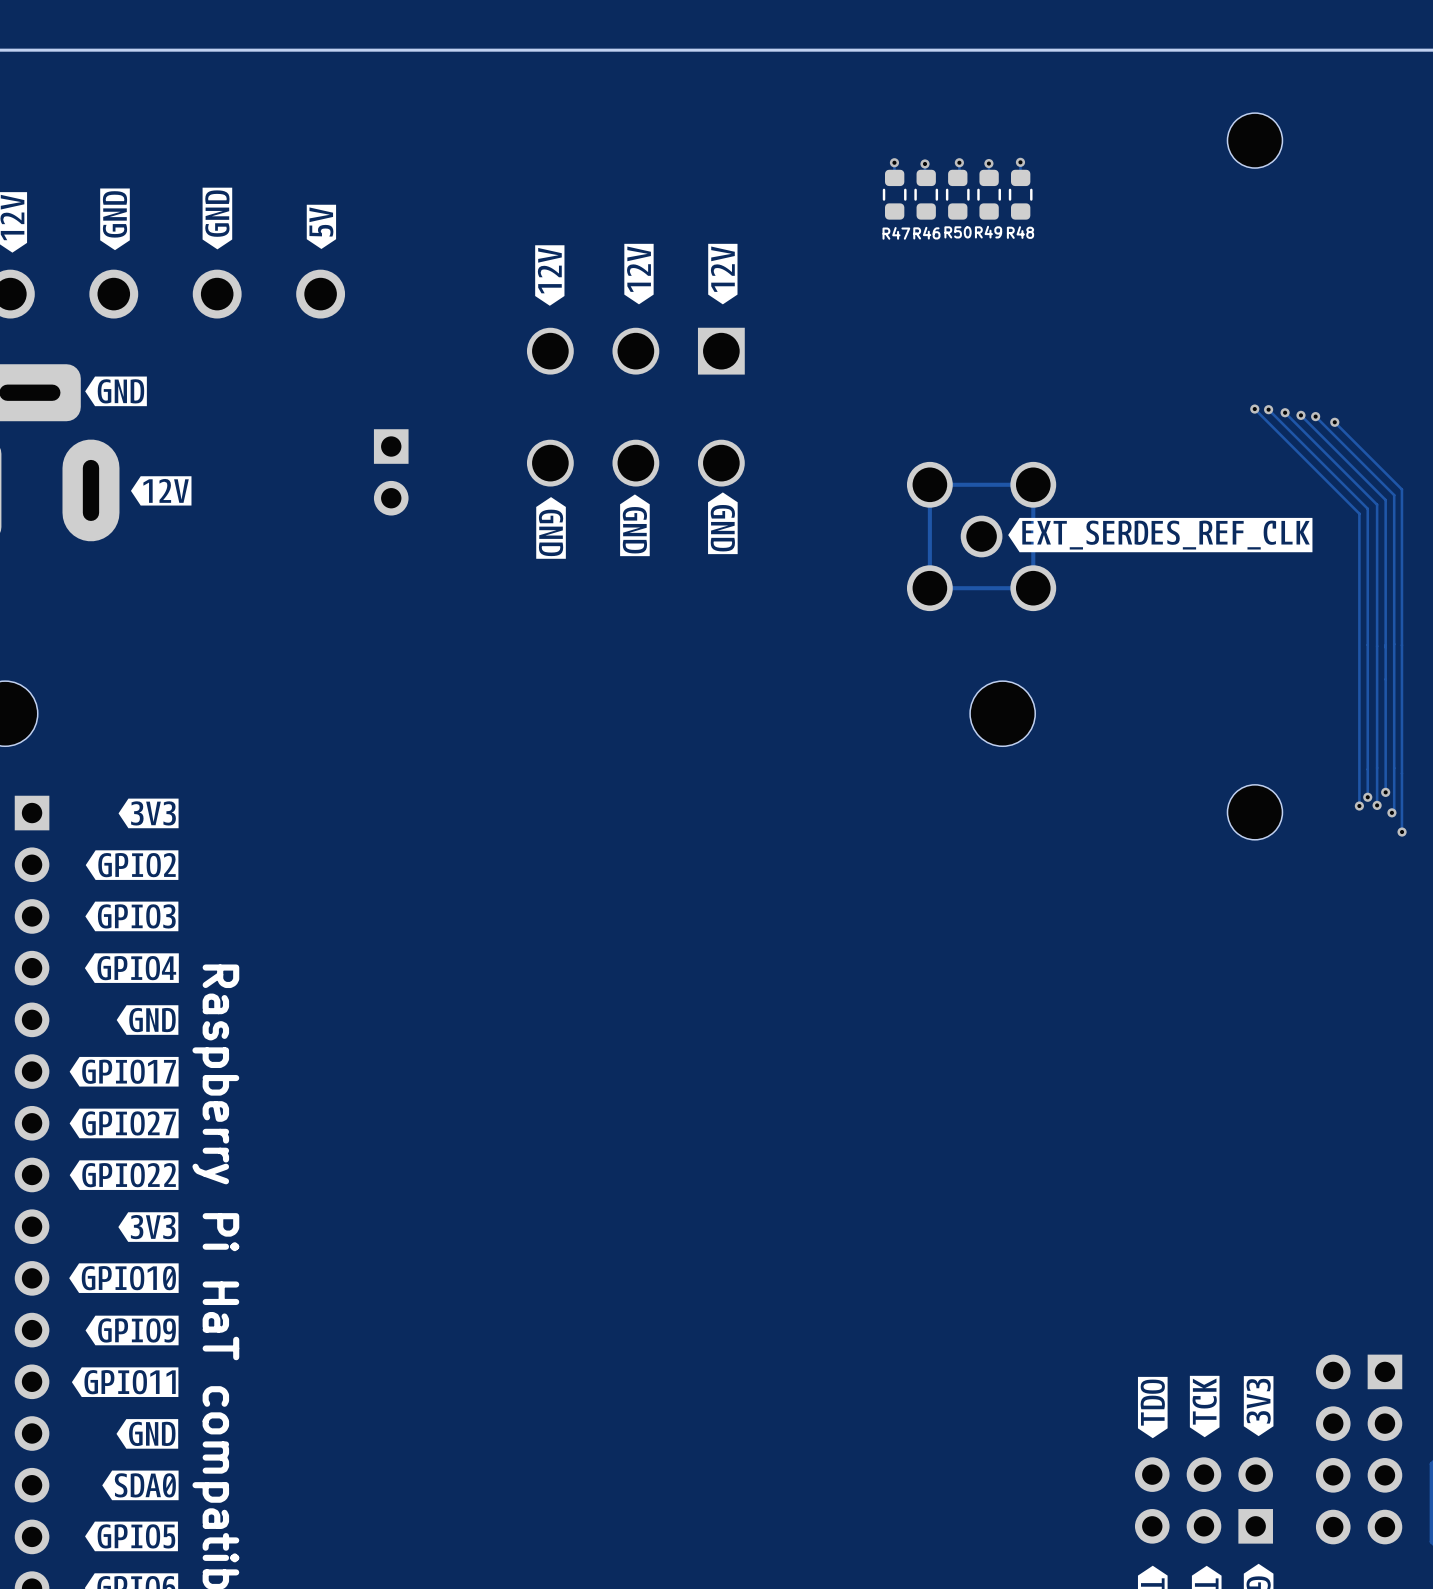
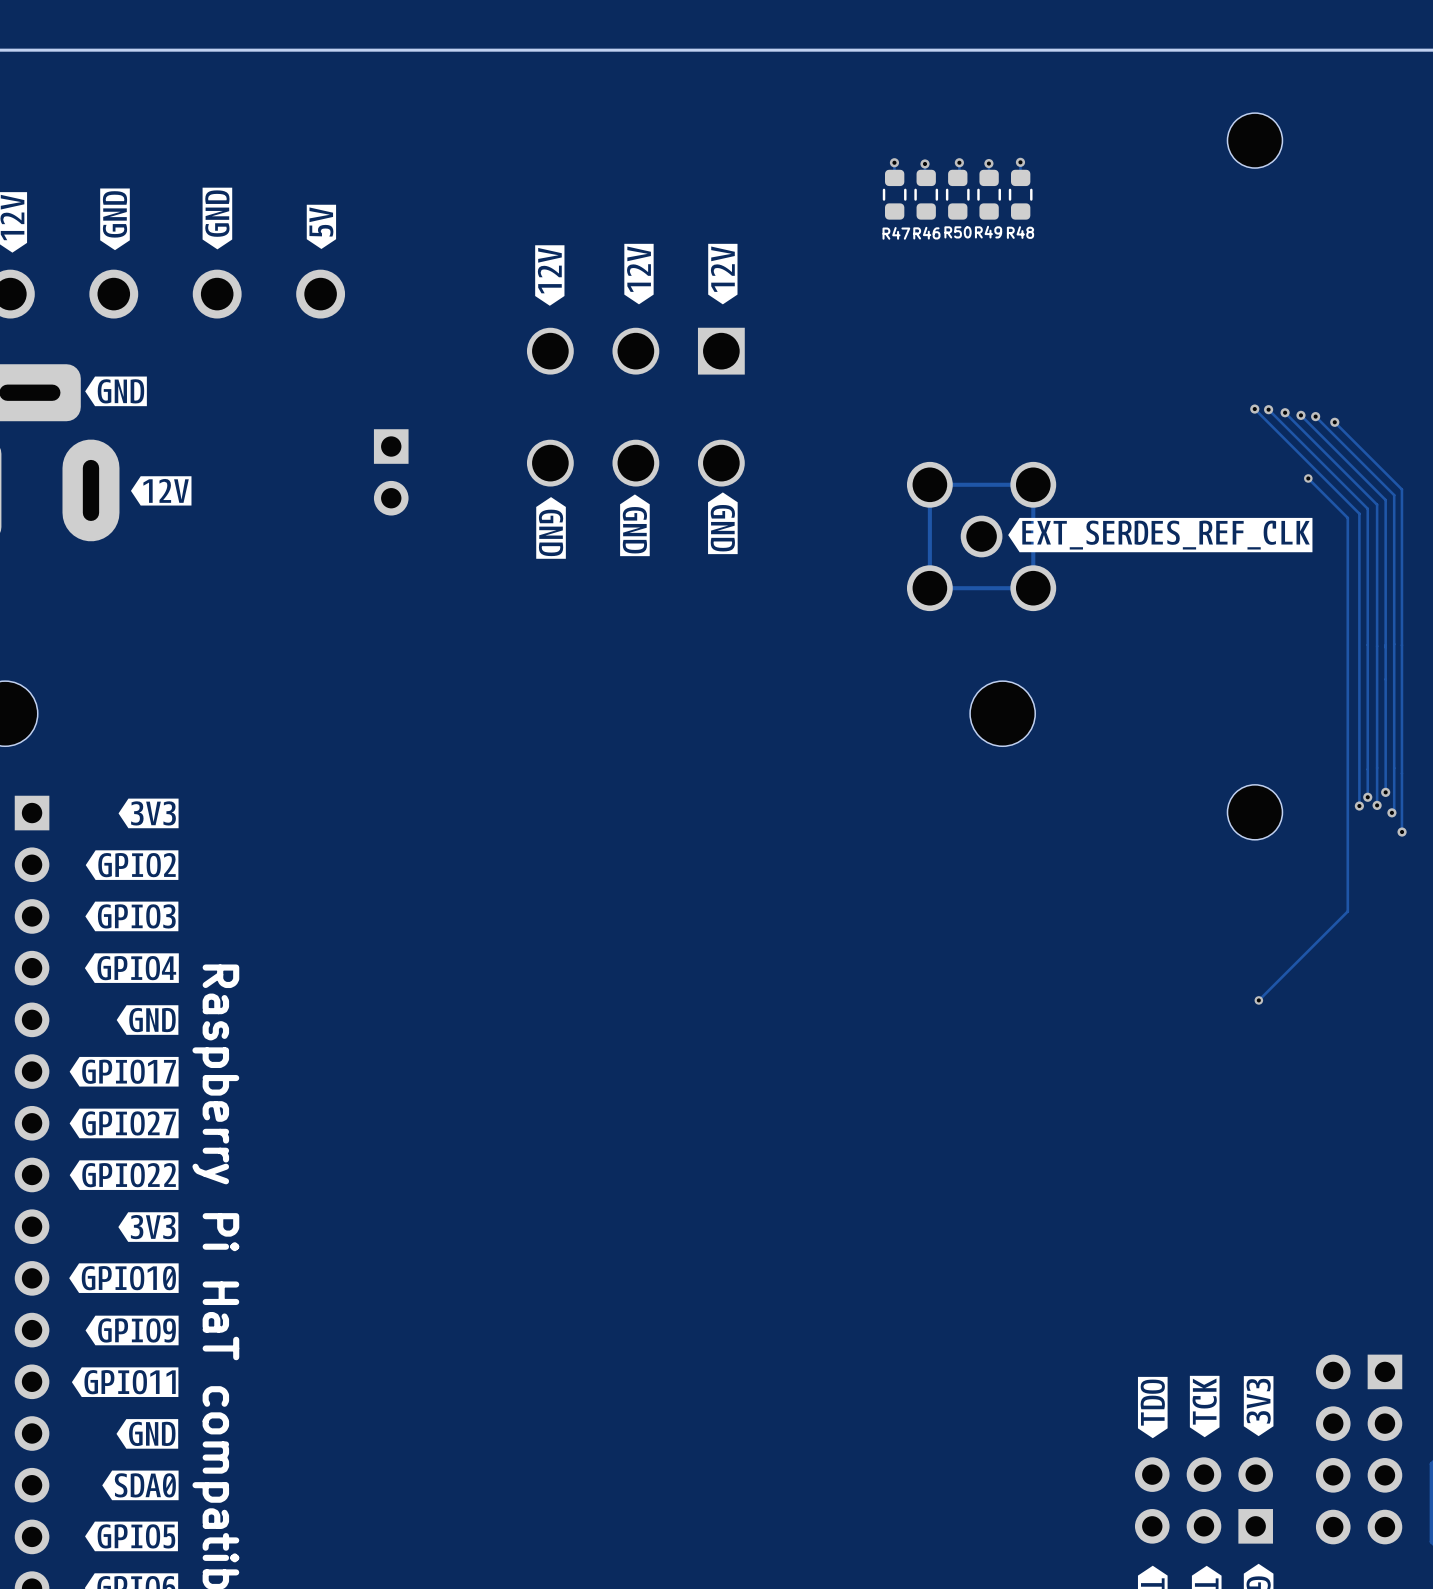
track: none -> (1308, 478) (1347, 517) (1347, 911) (1258, 1000)
via: none -> (1308, 478)
via: none -> (1258, 1000)

